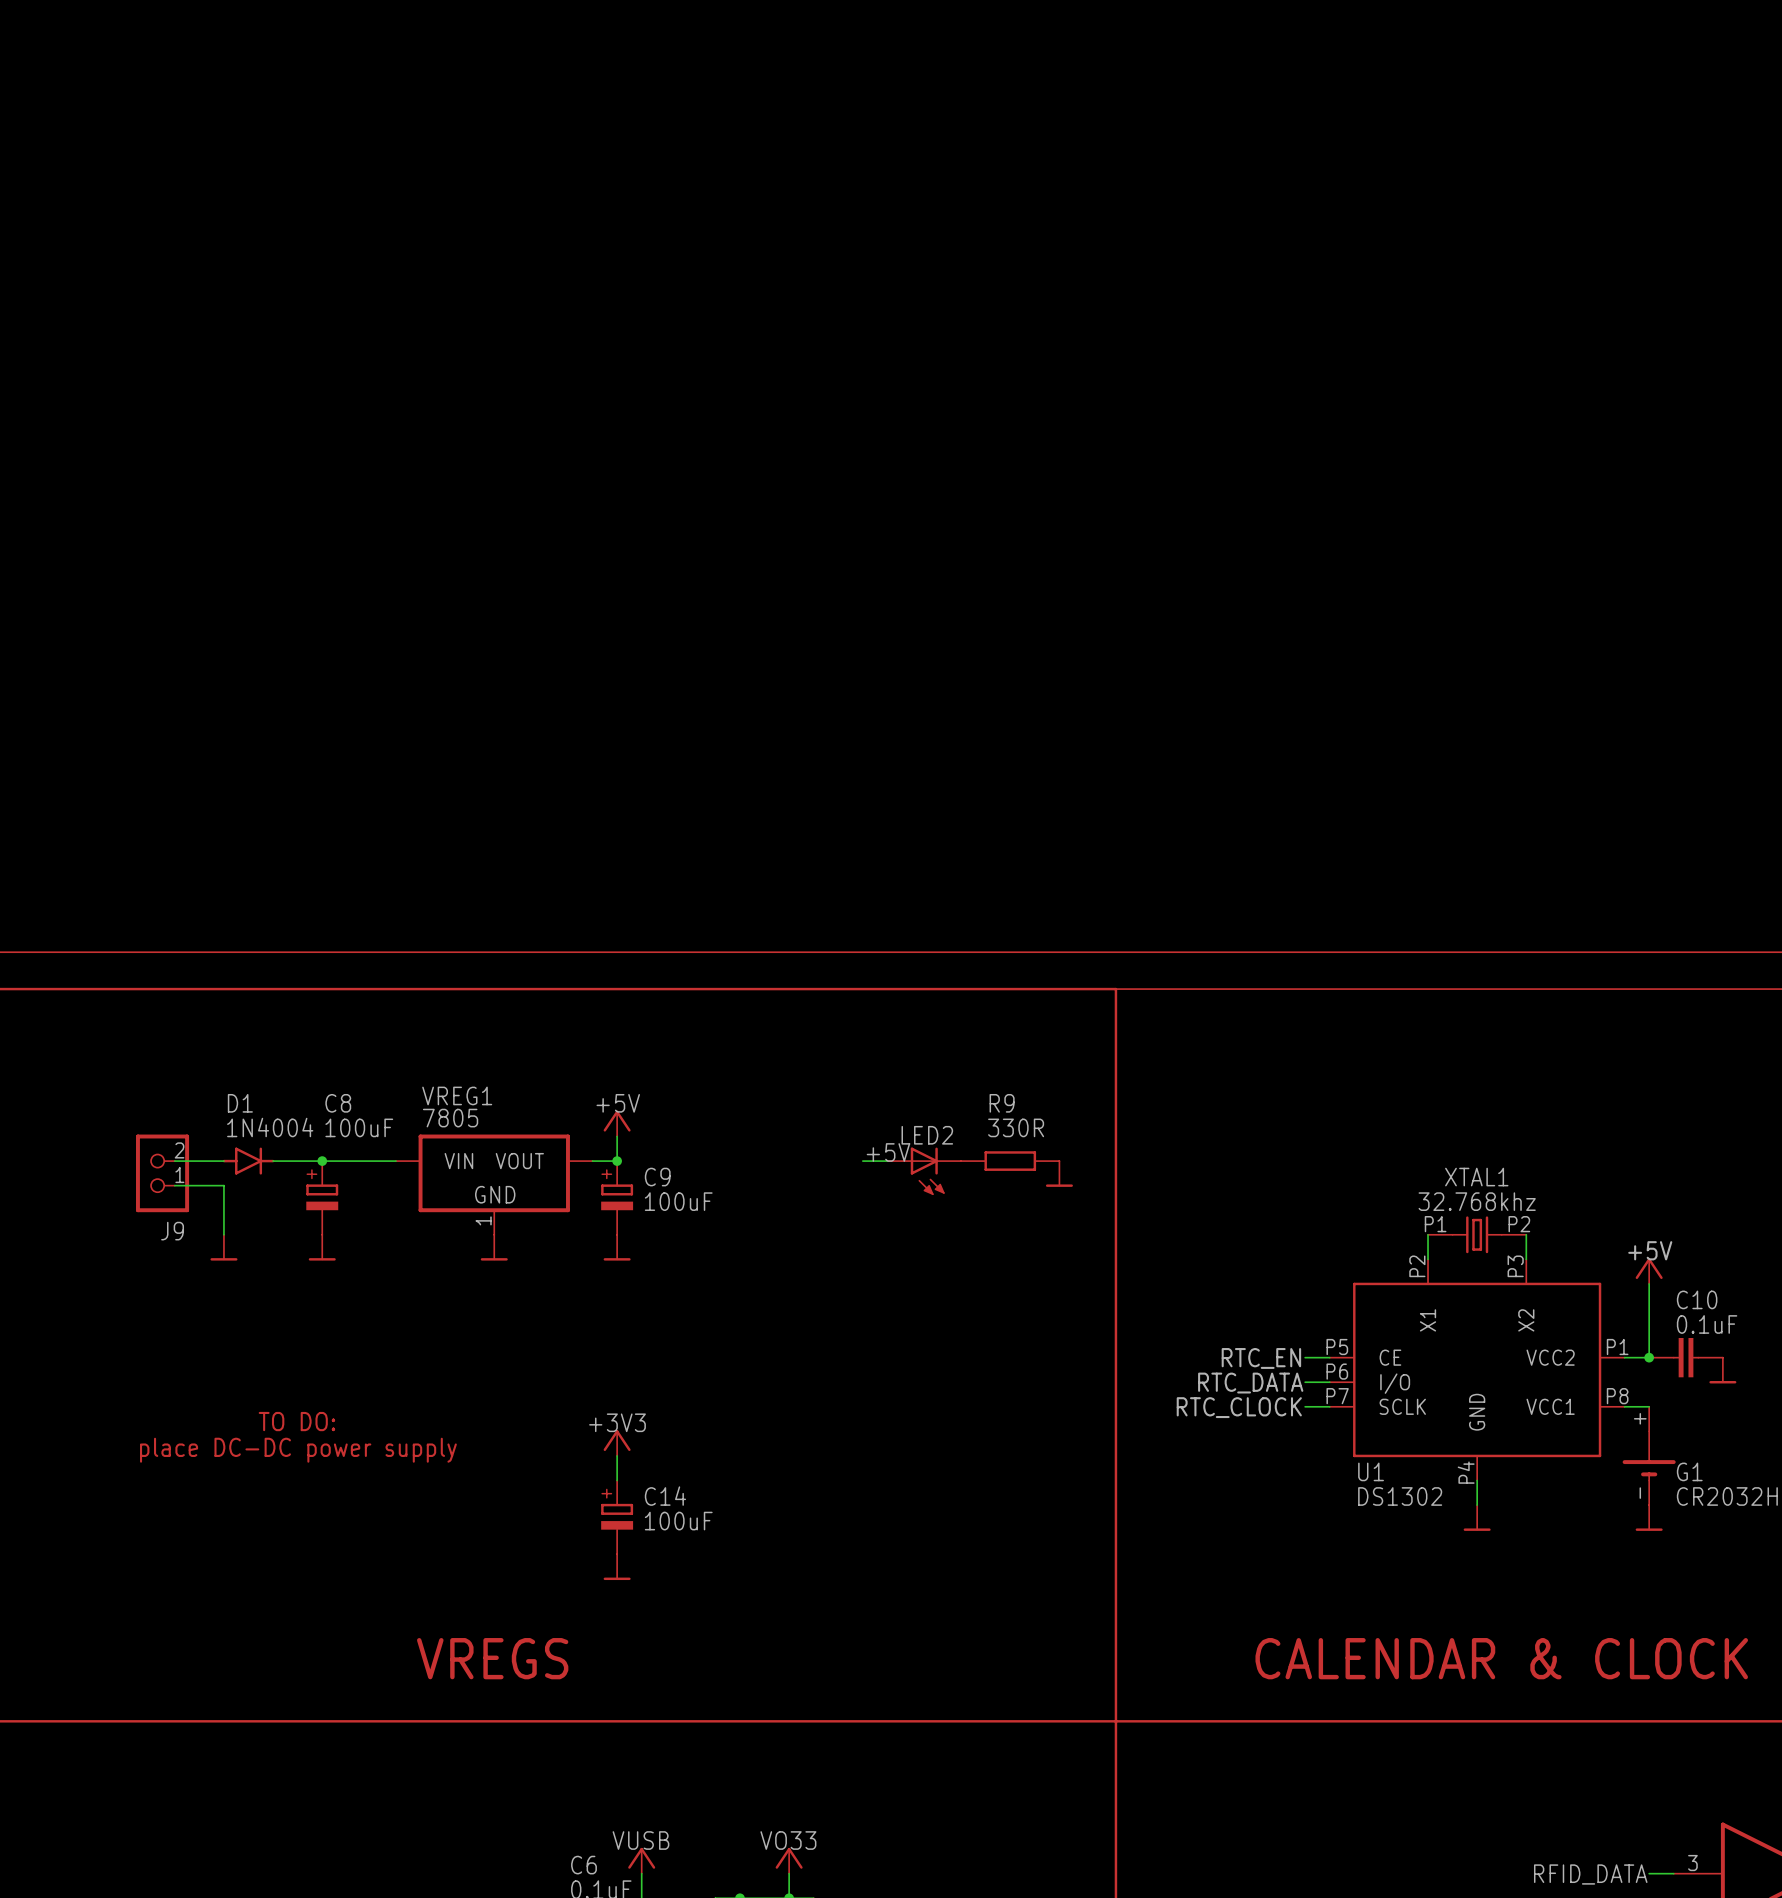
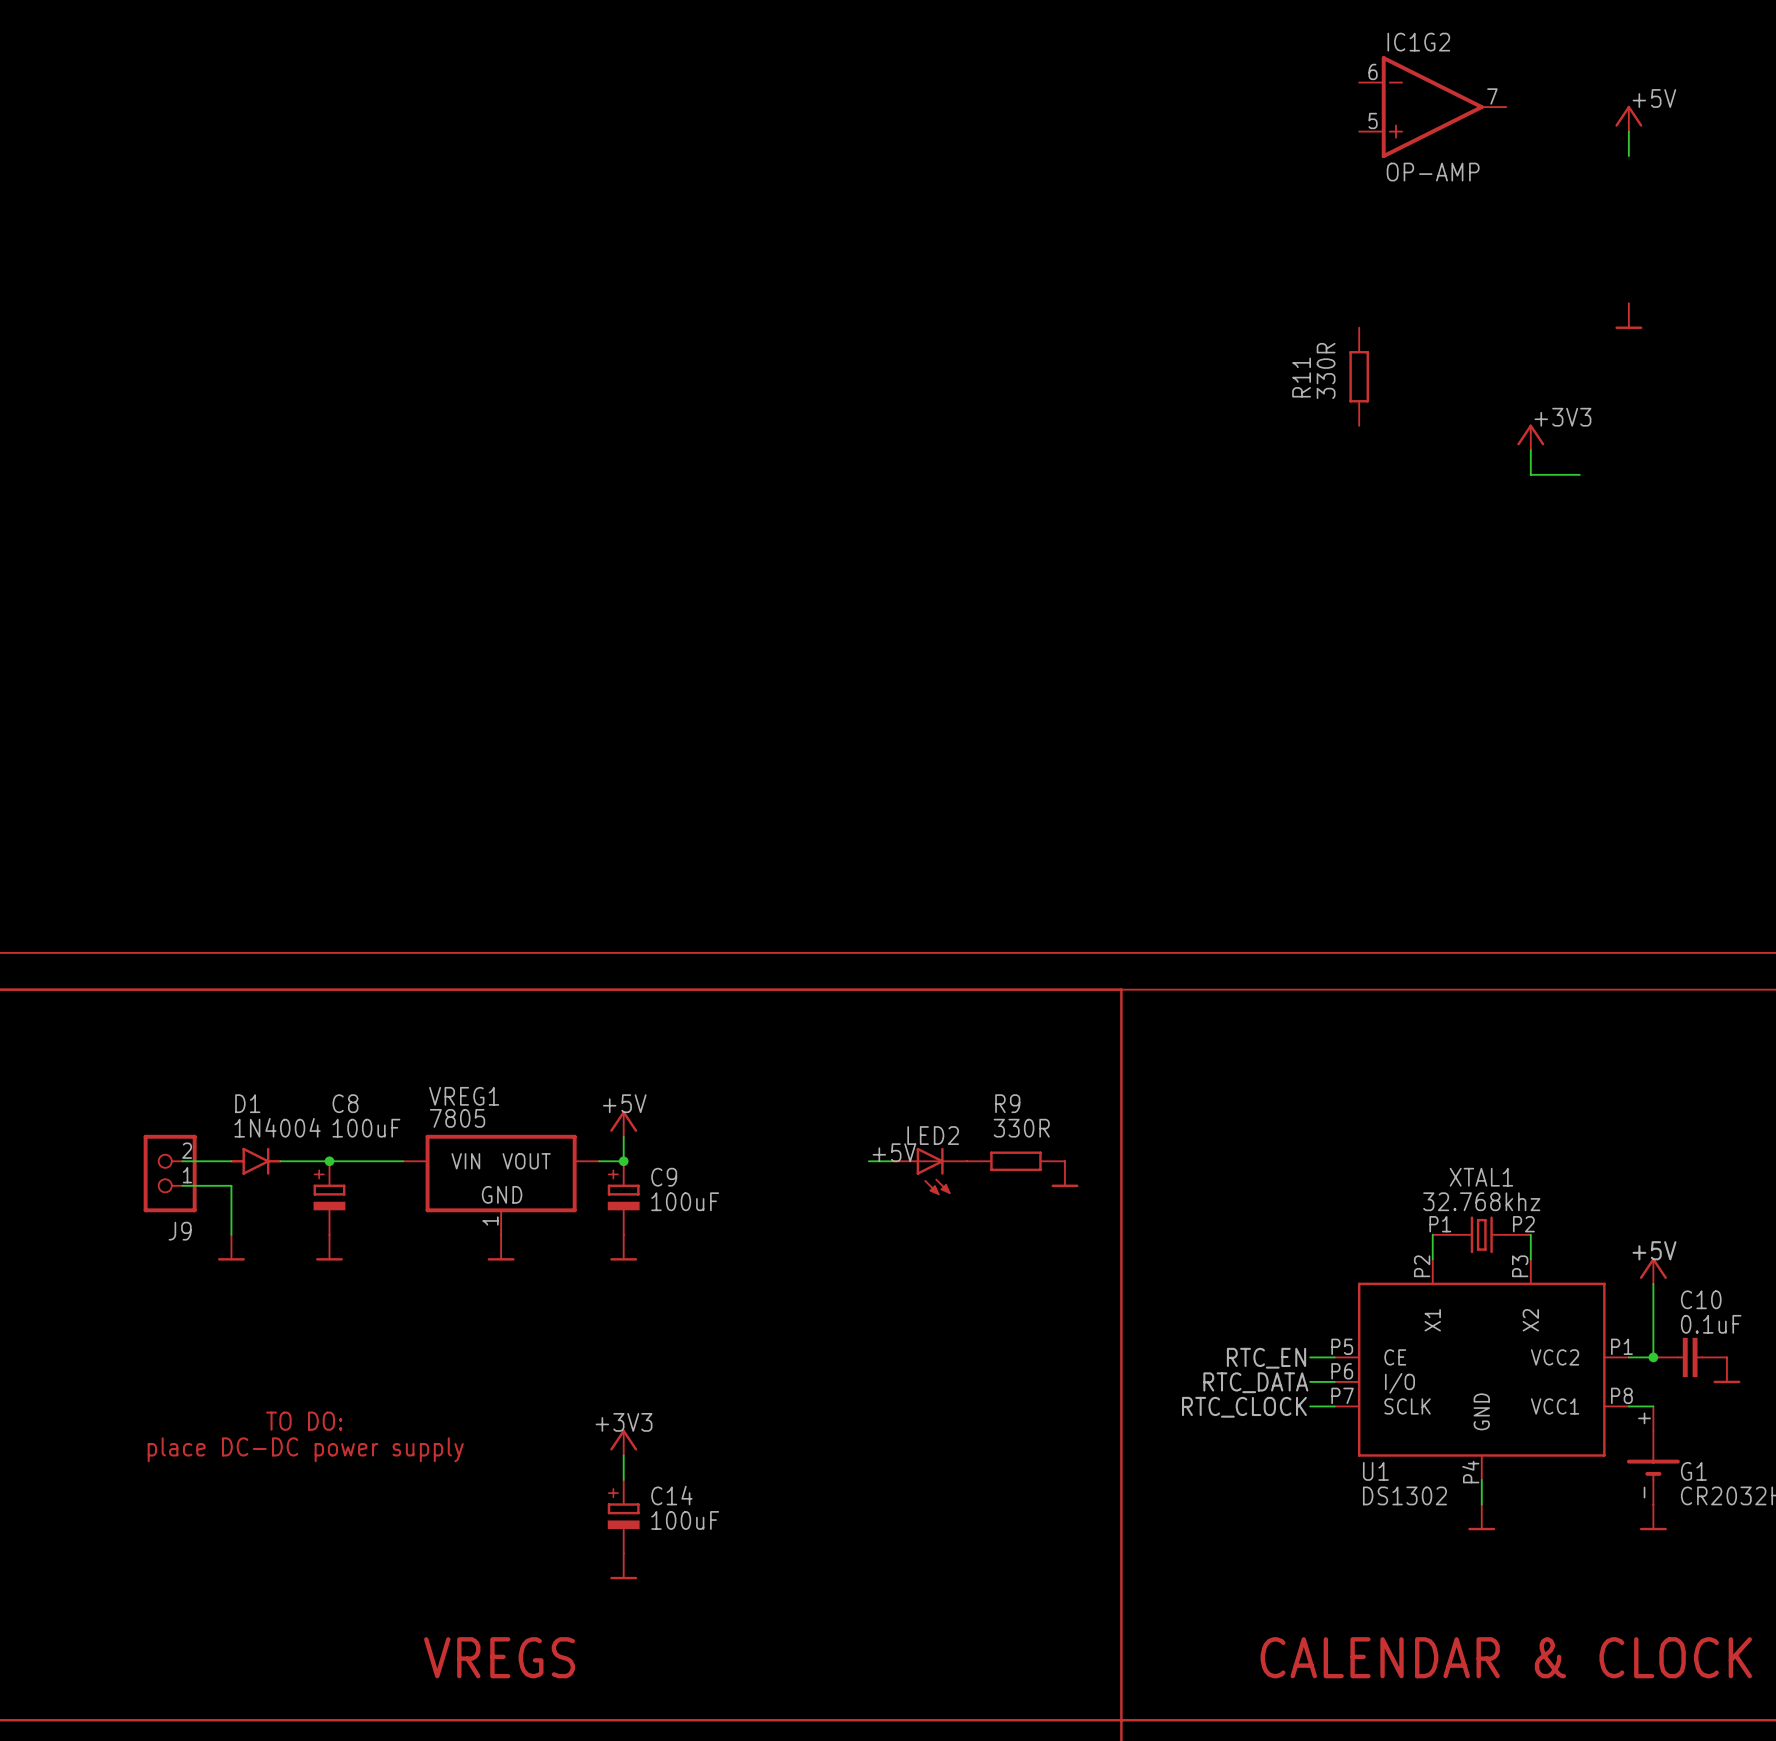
label: none -> +5V (1654, 98)
IC1G2: none -> OP-AMP (1432, 107)
power symbol: none -> (1628, 118)
wire: none -> (1628, 131) (1628, 156)
power symbol: none -> (1628, 316)
R11: none -> 330R (1359, 376)
label: none -> +3V3 (1562, 417)
power symbol: none -> (1530, 437)
wire: none -> (1530, 450) (1530, 474) (1579, 474)

